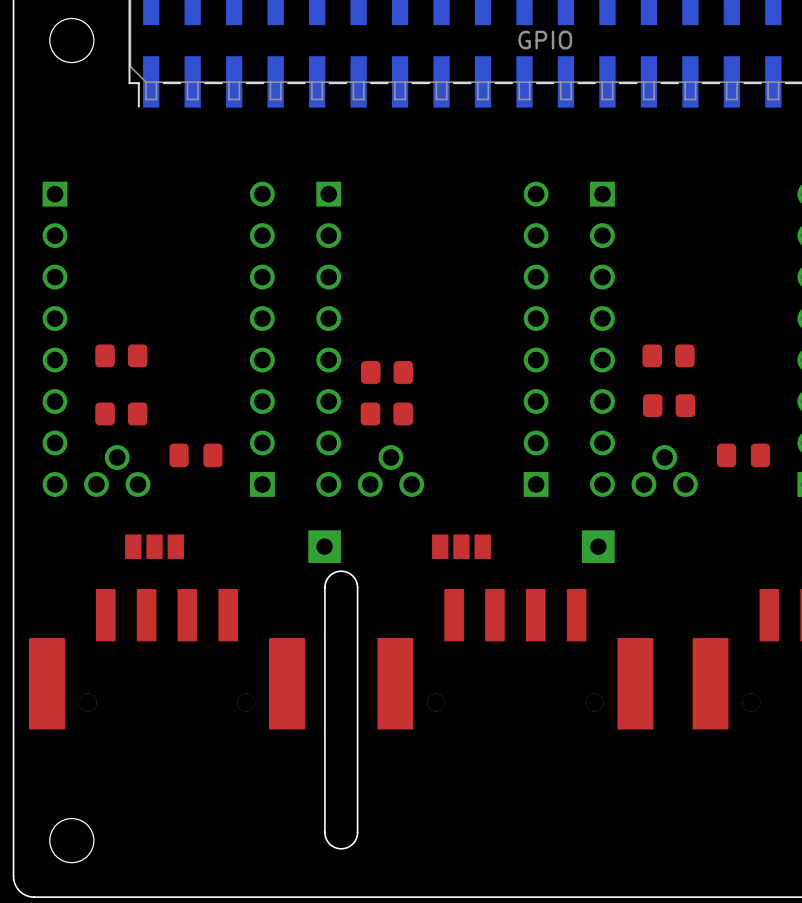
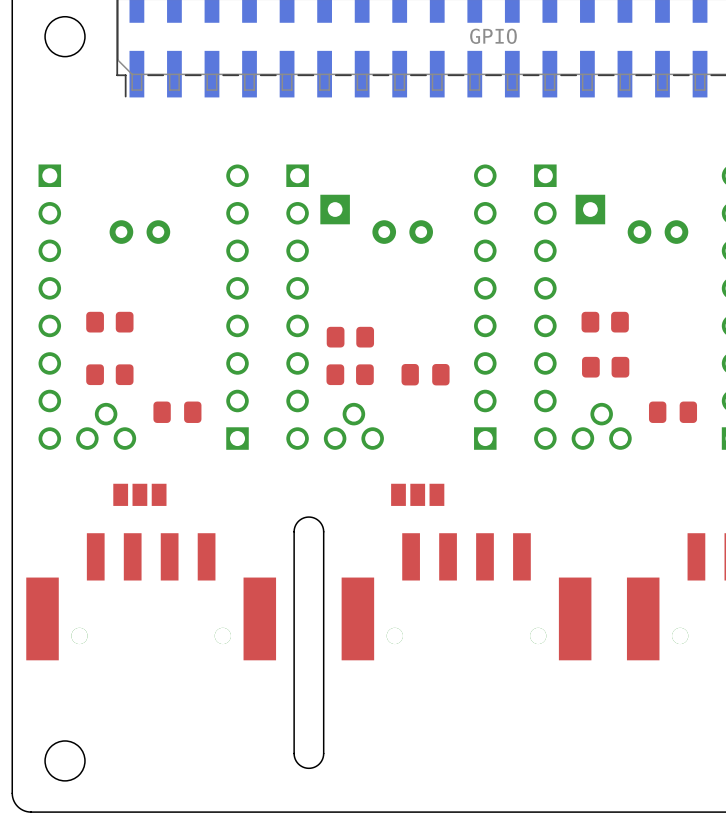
part: none -> (335, 209)
part: none -> (590, 209)
part: none -> (139, 232)
part: none -> (402, 232)
part: none -> (657, 232)
part: none -> (425, 374)
part: (324, 546) -> none
part: (598, 546) -> none

